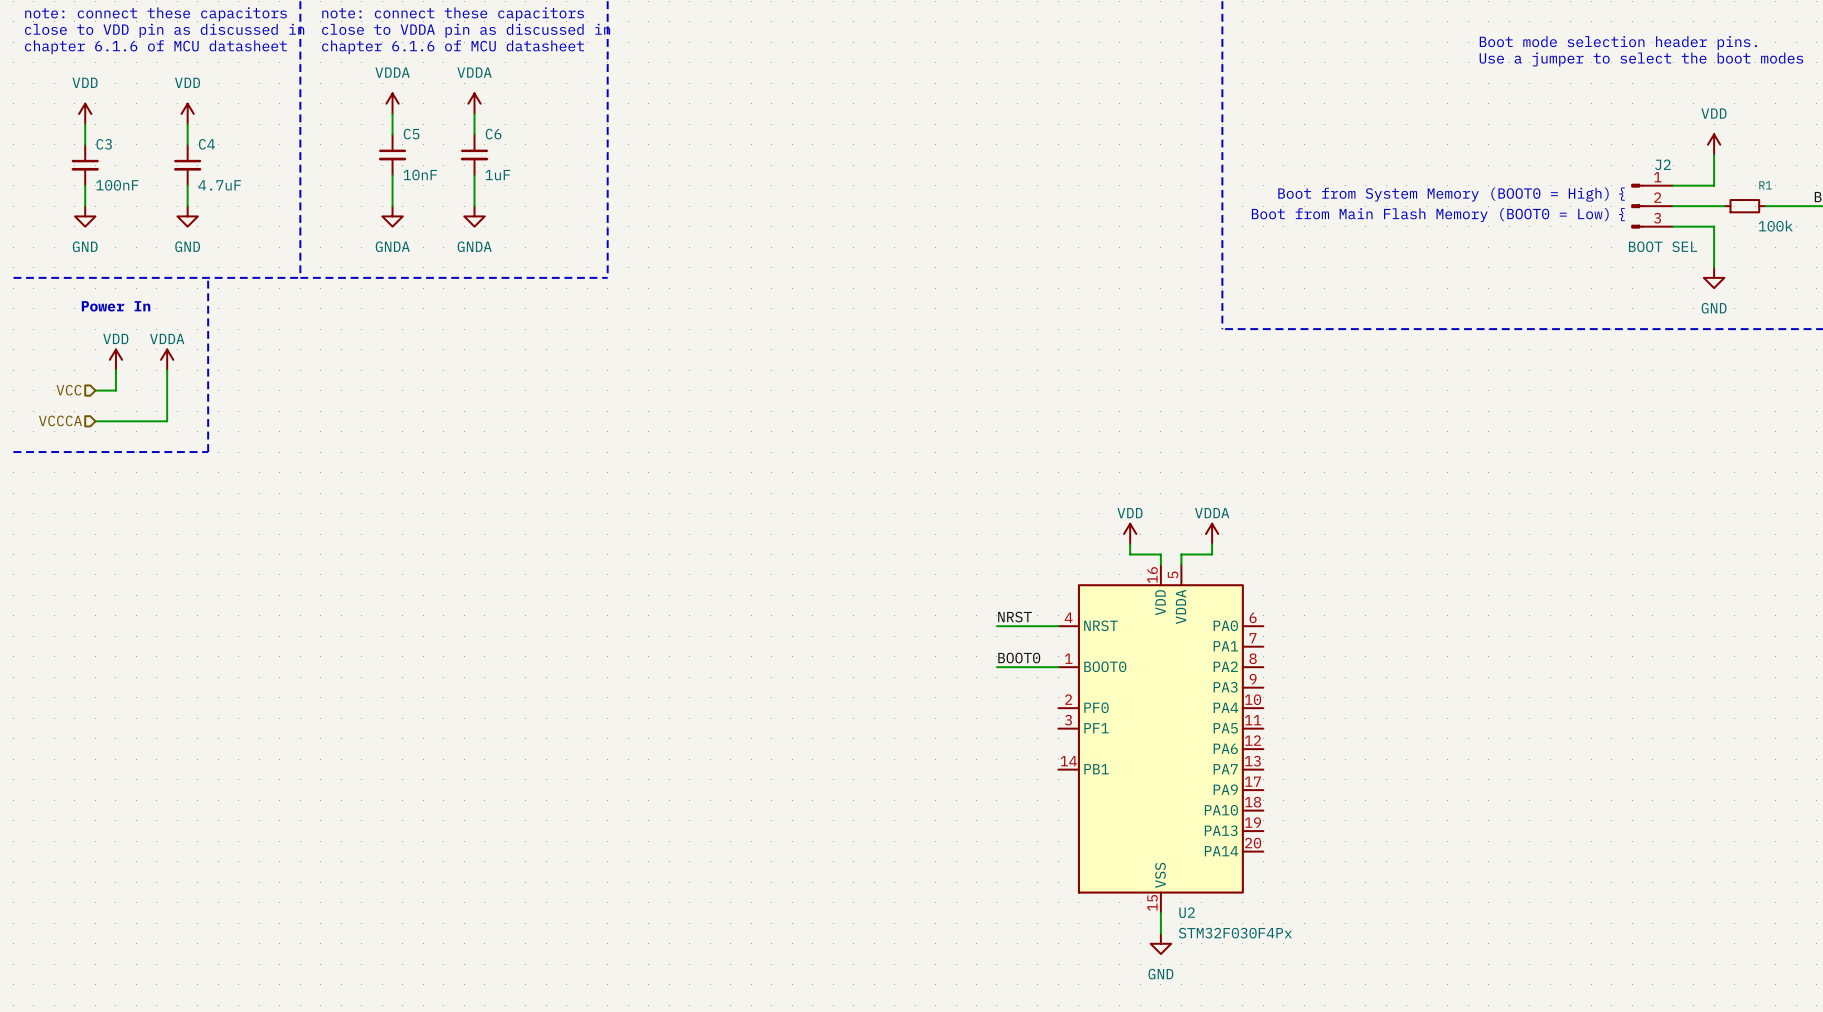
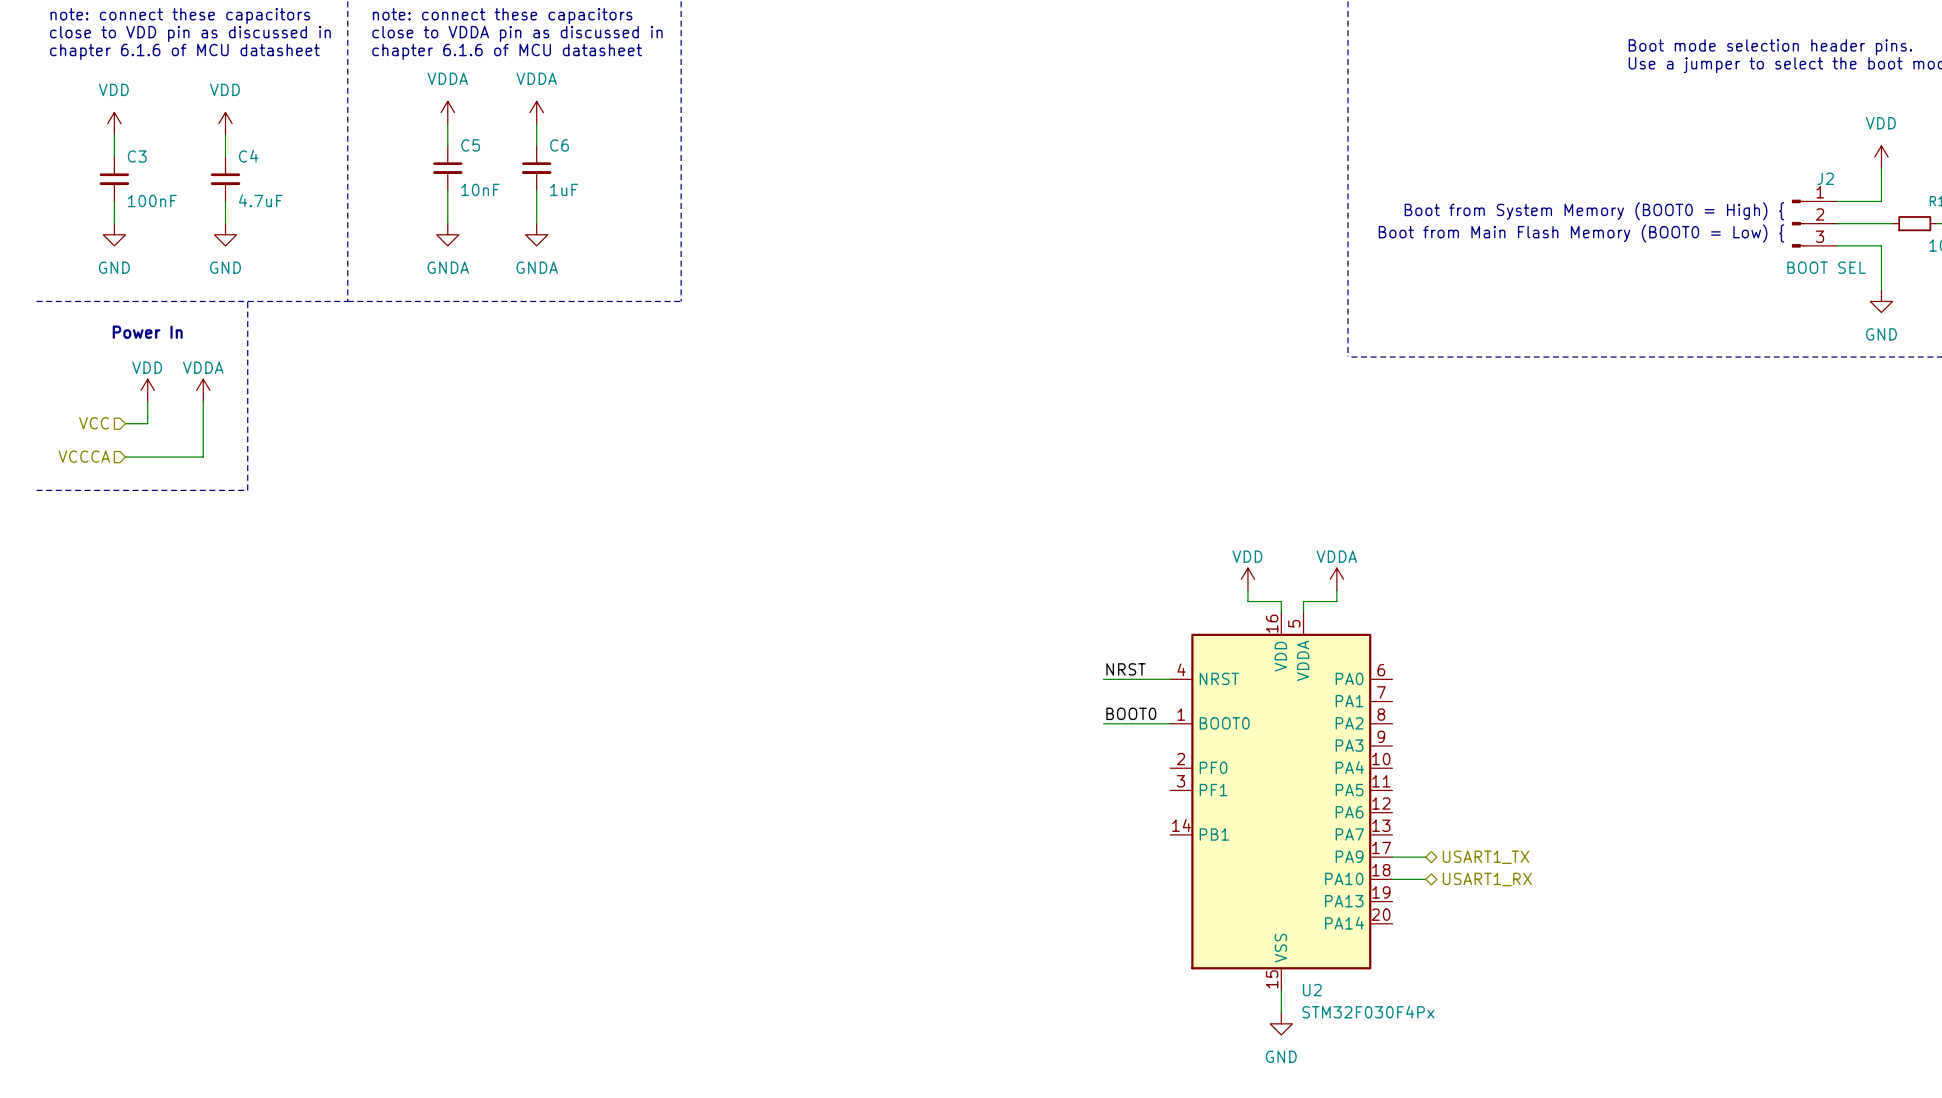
wire: none -> (1392, 857) (1425, 857)
hierarchical label: none -> USART1_TX (1486, 857)
wire: none -> (1392, 879) (1425, 879)
hierarchical label: none -> USART1_RX (1487, 879)

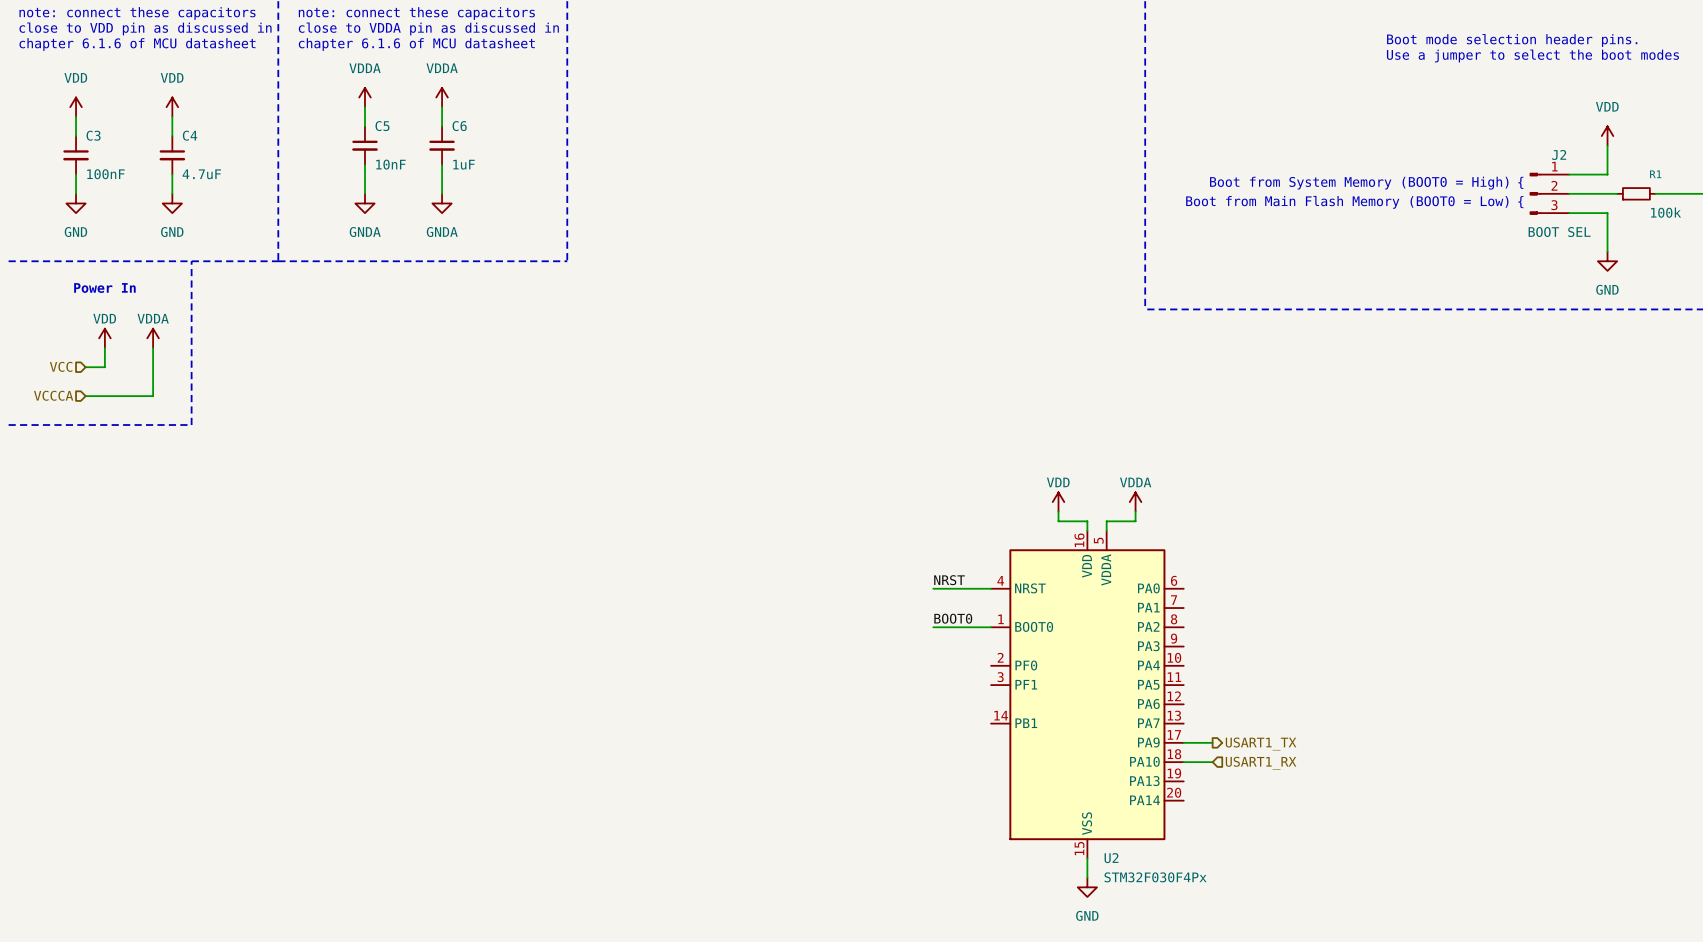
hierarchical label shape: bidirectional (1486, 857) -> output (1261, 743)
hierarchical label shape: bidirectional (1487, 879) -> input (1261, 763)

